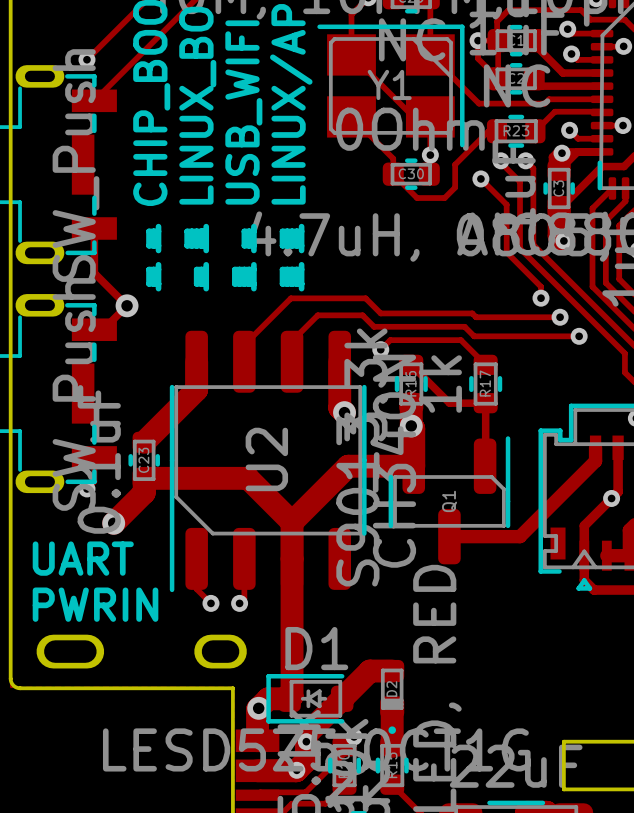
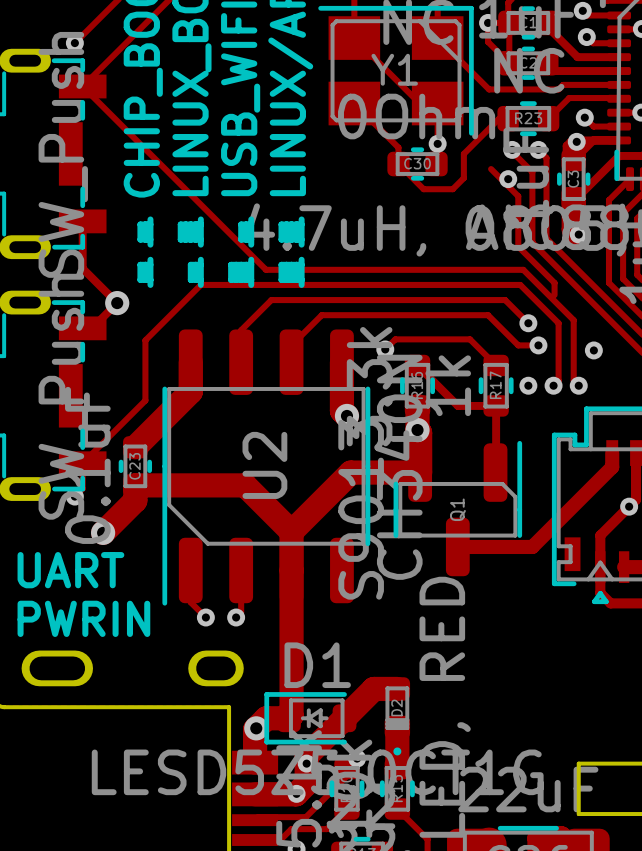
track: none -> (82, 86) (266, 269) (523, 269) (573, 320) (573, 380) (578, 385)
via position: (480, 178) -> (508, 179)
via: (541, 298) -> none
track: (476, 317) (472, 313) (380, 313) (365, 298) (290, 298) (244, 344) -> (528, 323) (505, 300) (271, 300) (241, 330) (241, 344)
track: (478, 317) (560, 317) -> (488, 315) (518, 345) (538, 345)
via: (560, 317) -> none
via: none -> (528, 323)
track: (579, 336) (474, 336) (464, 326) (374, 326) (362, 315) (317, 315) (292, 341) (292, 345) -> (486, 315) (321, 315) (291, 345)
via position: (579, 336) -> (593, 350)
via: none -> (538, 345)
via: none -> (528, 385)
track: none -> (553, 385) (558, 380) (558, 323) (520, 284) (200, 284) (145, 340) (145, 400) (82, 463)
via: none -> (553, 385)
via: none -> (578, 385)

